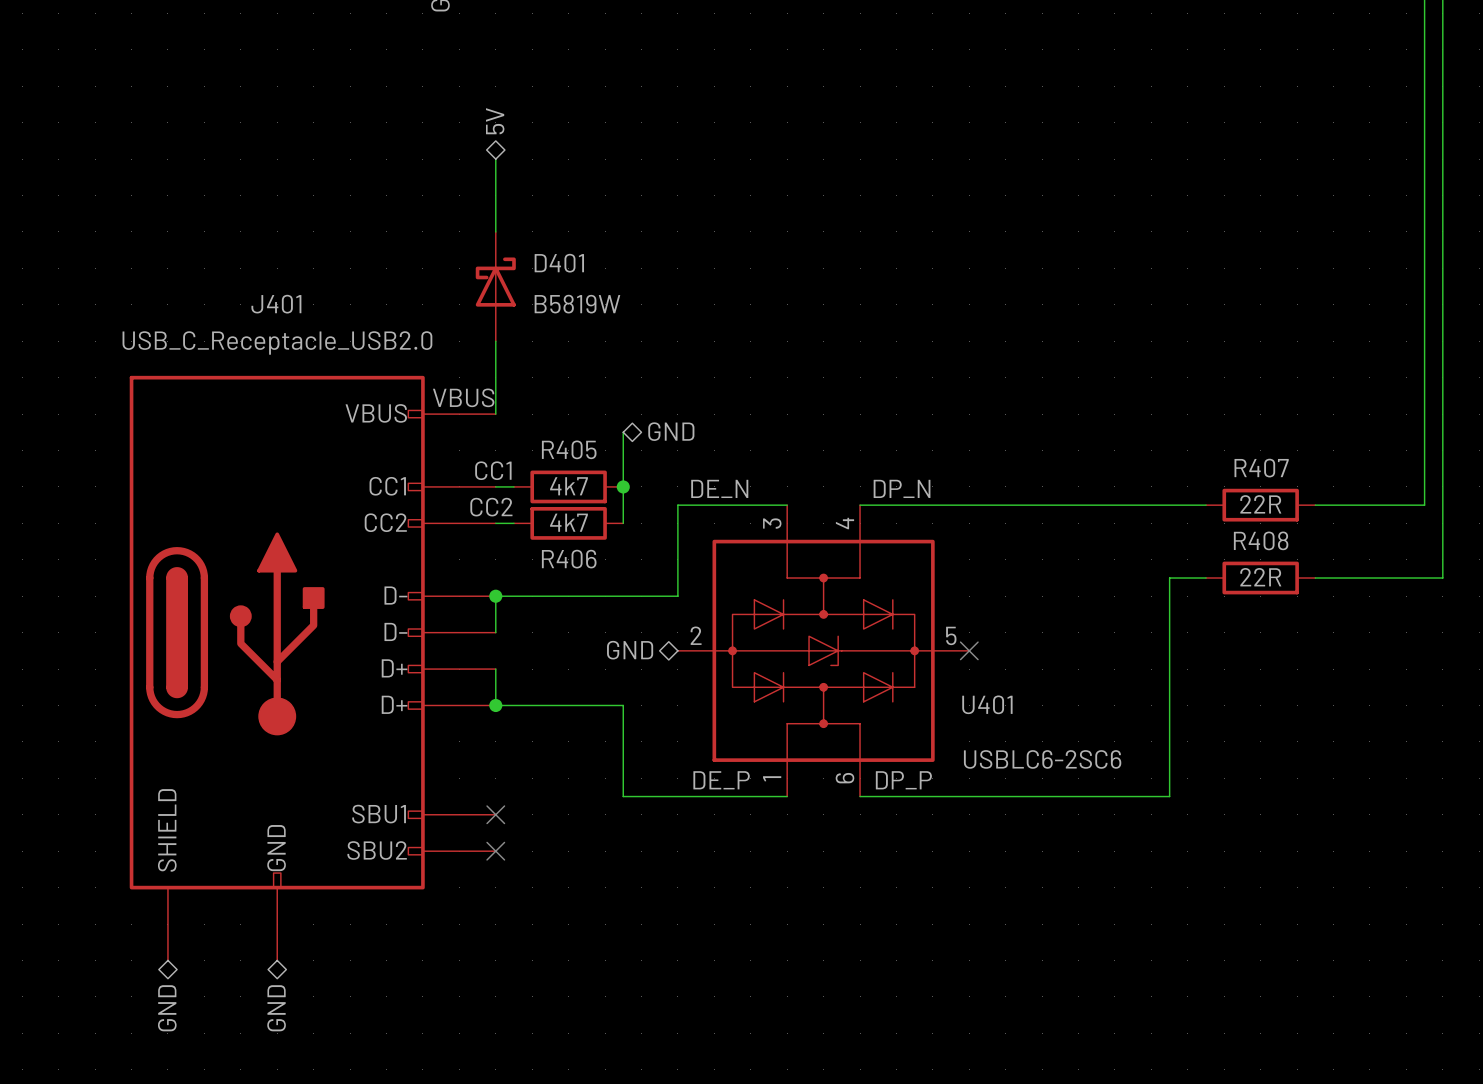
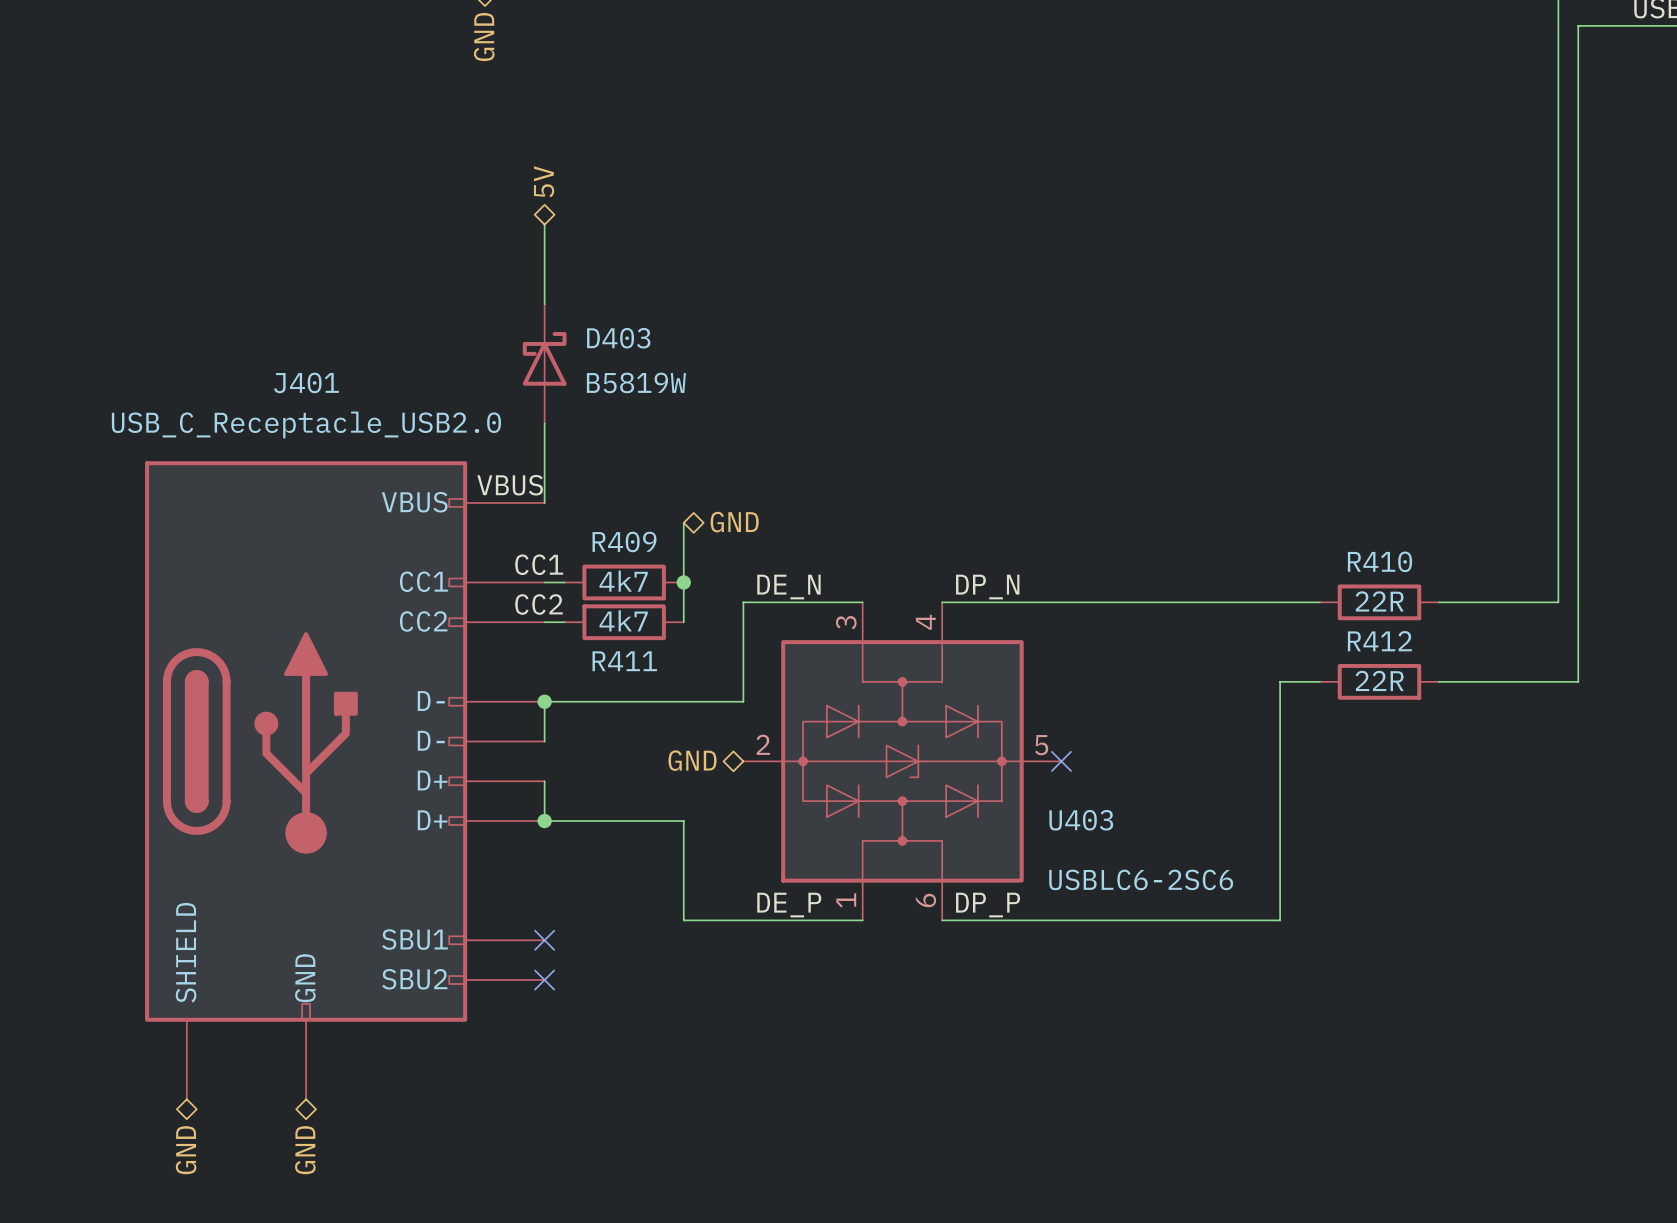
D401 name: D401 (559, 263) -> D403 (618, 338)
R405 name: R405 (569, 449) -> R409 (624, 541)
R407 name: R407 (1261, 468) -> R410 (1379, 561)
R408 name: R408 (1261, 540) -> R412 (1379, 641)
R406 name: R406 (569, 559) -> R411 (624, 661)
U401 name: U401 (987, 704) -> U403 (1081, 820)

